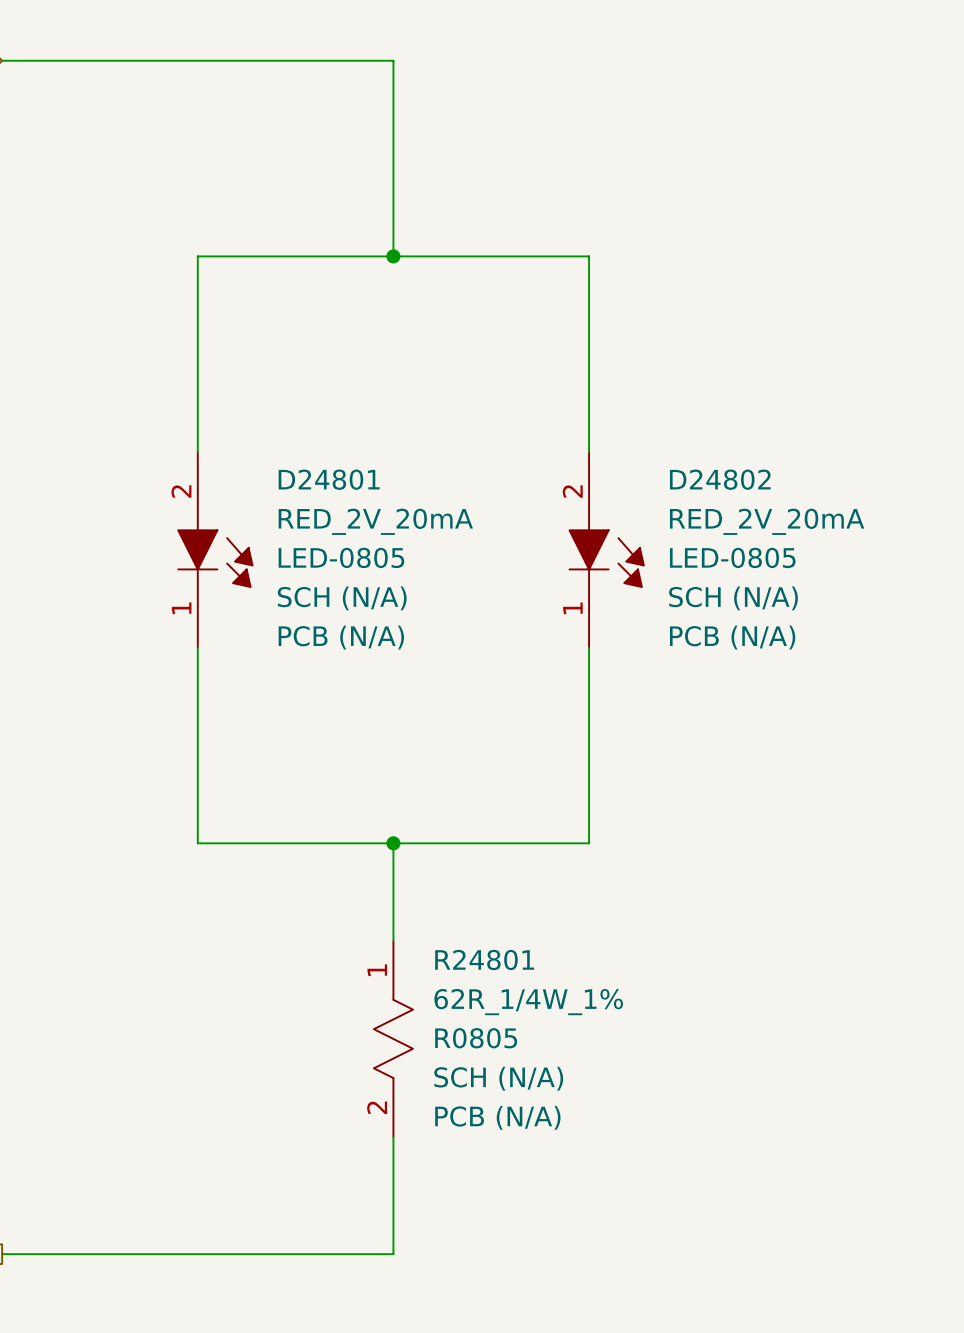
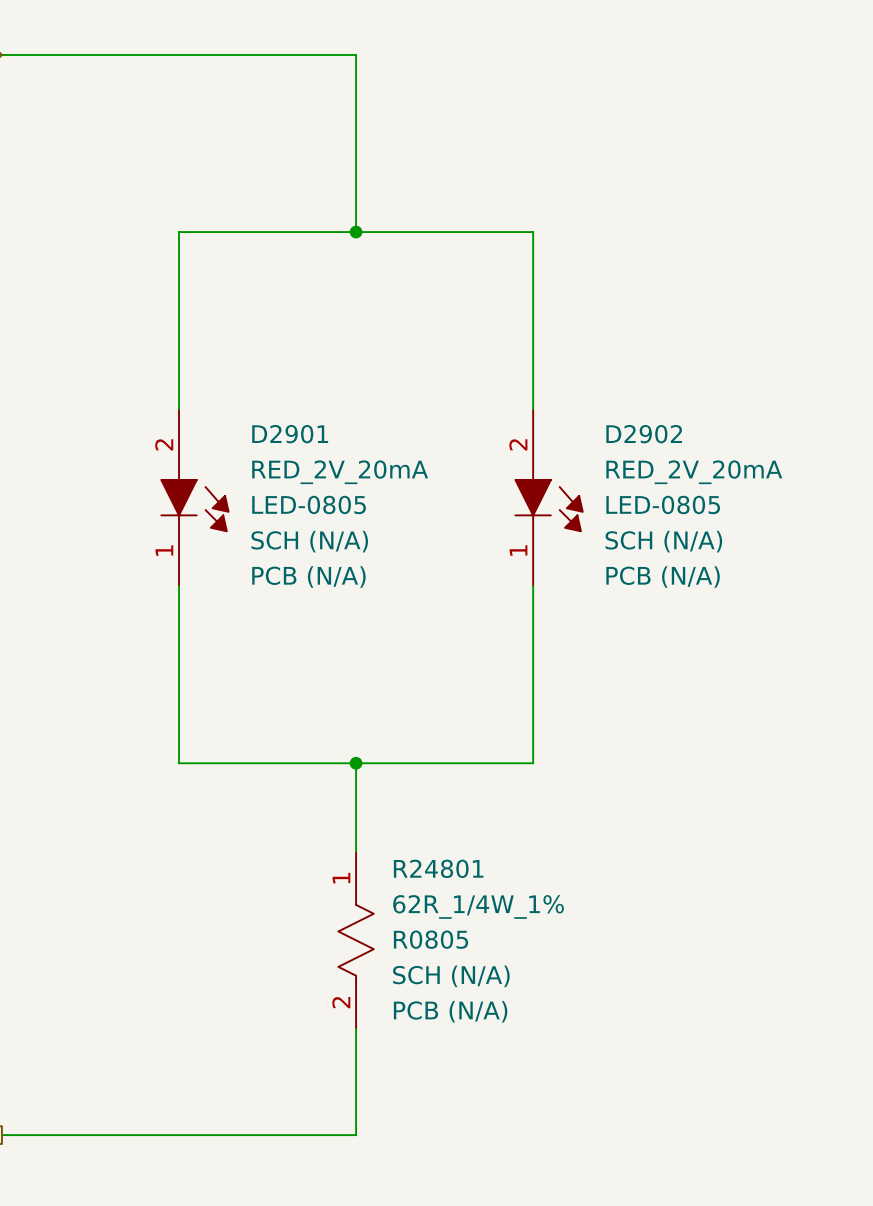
D24801 name: D24801 (329, 479) -> D2901 (290, 434)
D24802 name: D24802 (720, 479) -> D2902 (644, 434)

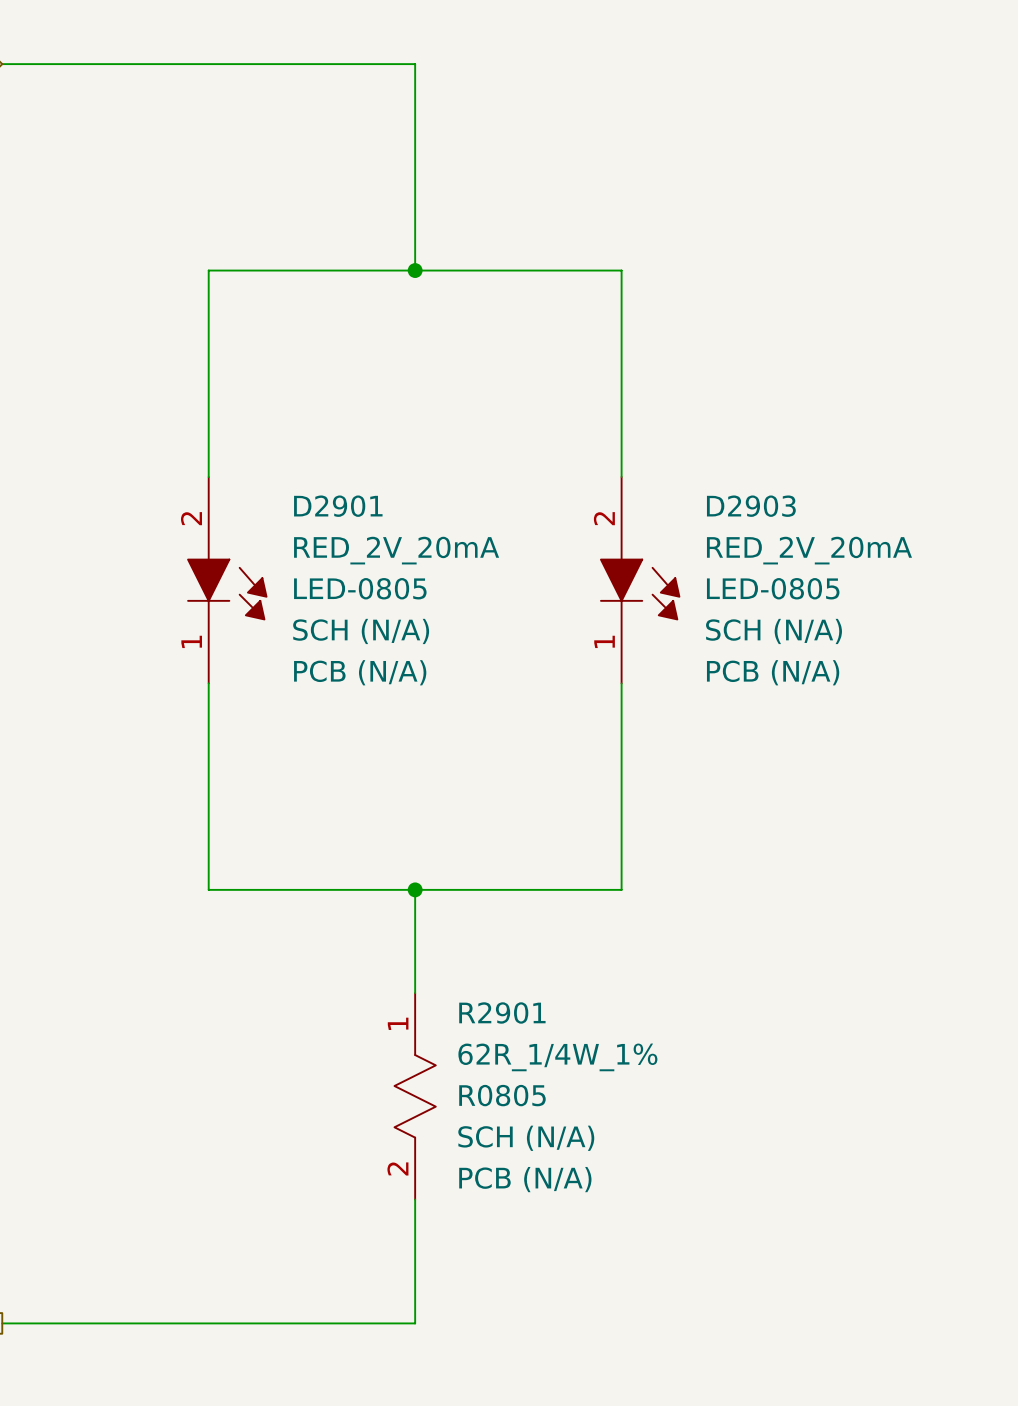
D2902 name: D2902 (644, 434) -> D2903 (751, 506)
R24801 name: R24801 (438, 868) -> R2901 (502, 1012)

